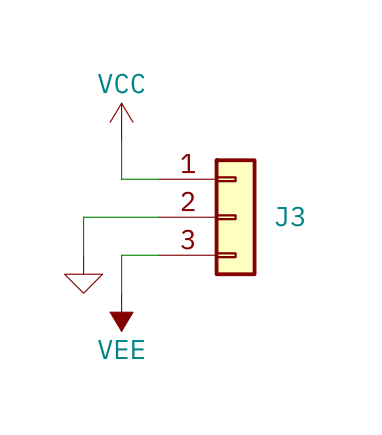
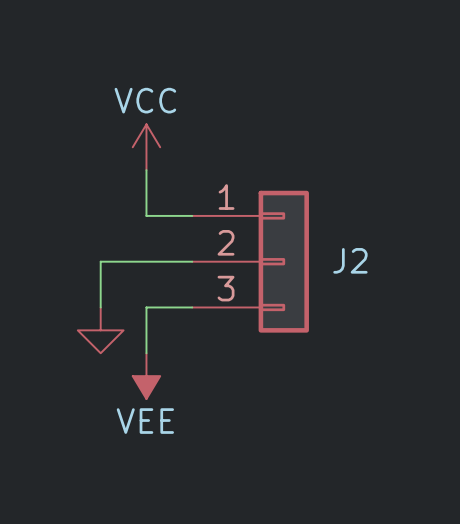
J3 name: J3 (289, 216) -> J2 (350, 260)

